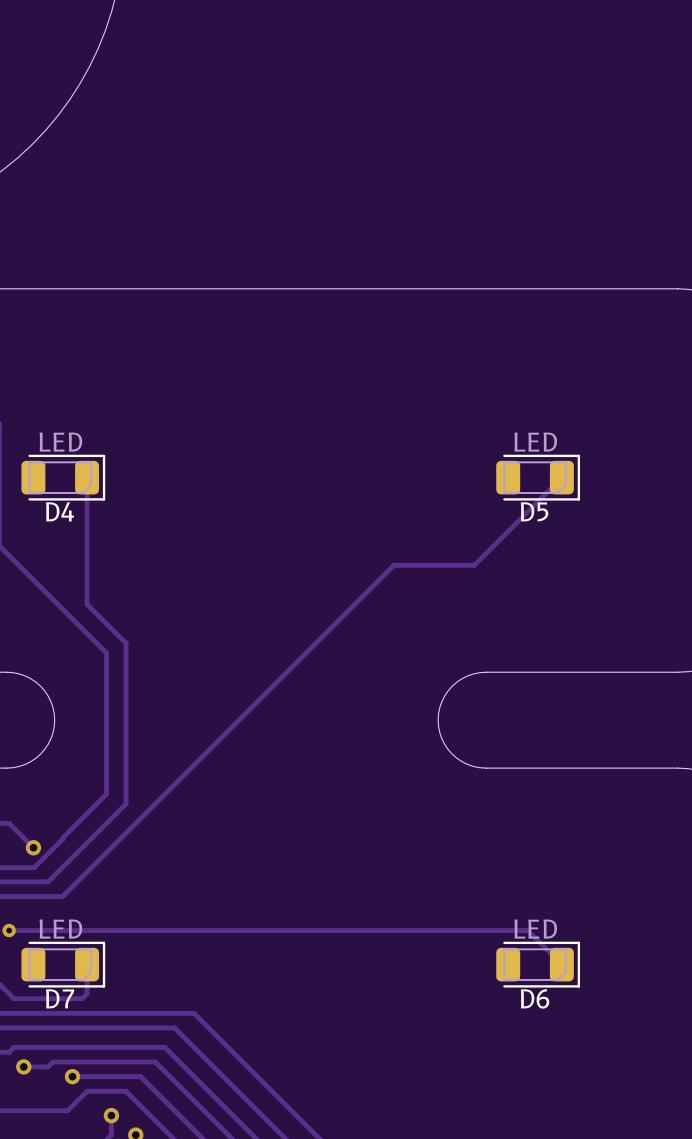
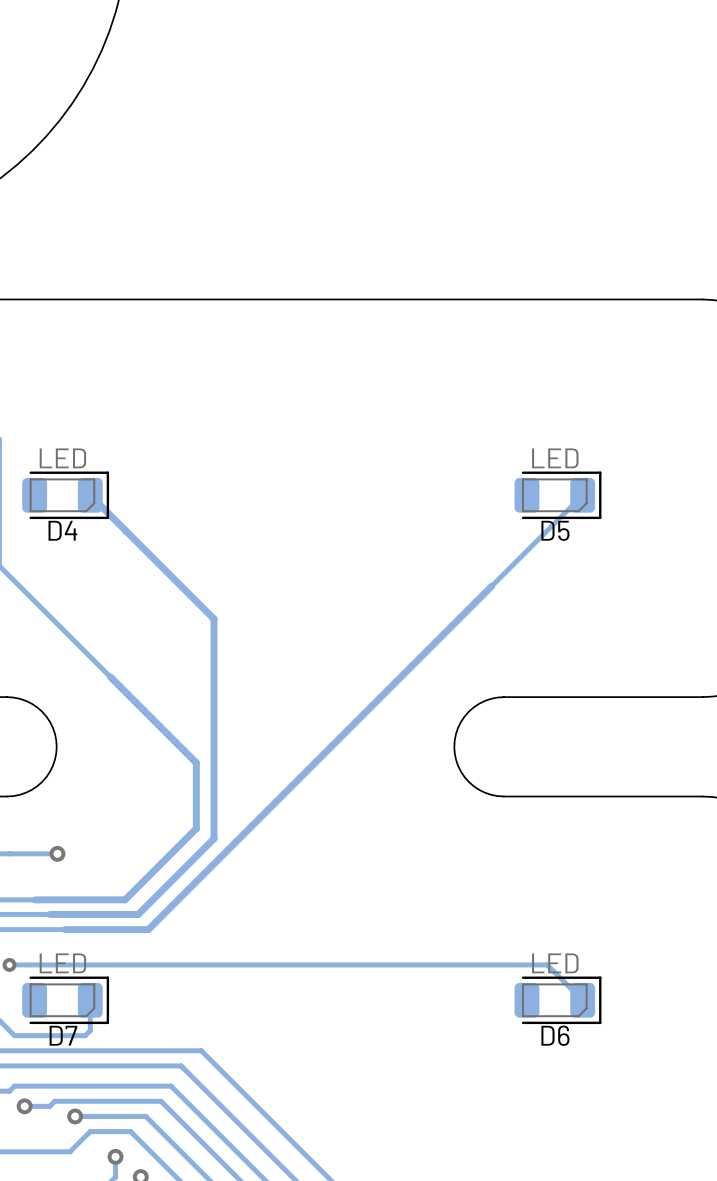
track: (87, 477) (87, 604) (126, 643) (126, 803) (48, 881) -> (90, 495) (214, 619) (214, 838) (138, 914) (49, 914)
track: (474, 565) (393, 565) (62, 896) -> (491, 586) (148, 929) (65, 929)
track: (106, 652) (106, 794) (34, 867) -> (110, 677) (196, 762) (196, 828) (125, 899) (35, 899)
track: (9, 823) (33, 847) -> (9, 853) (57, 853)
via position: (33, 847) -> (57, 853)

